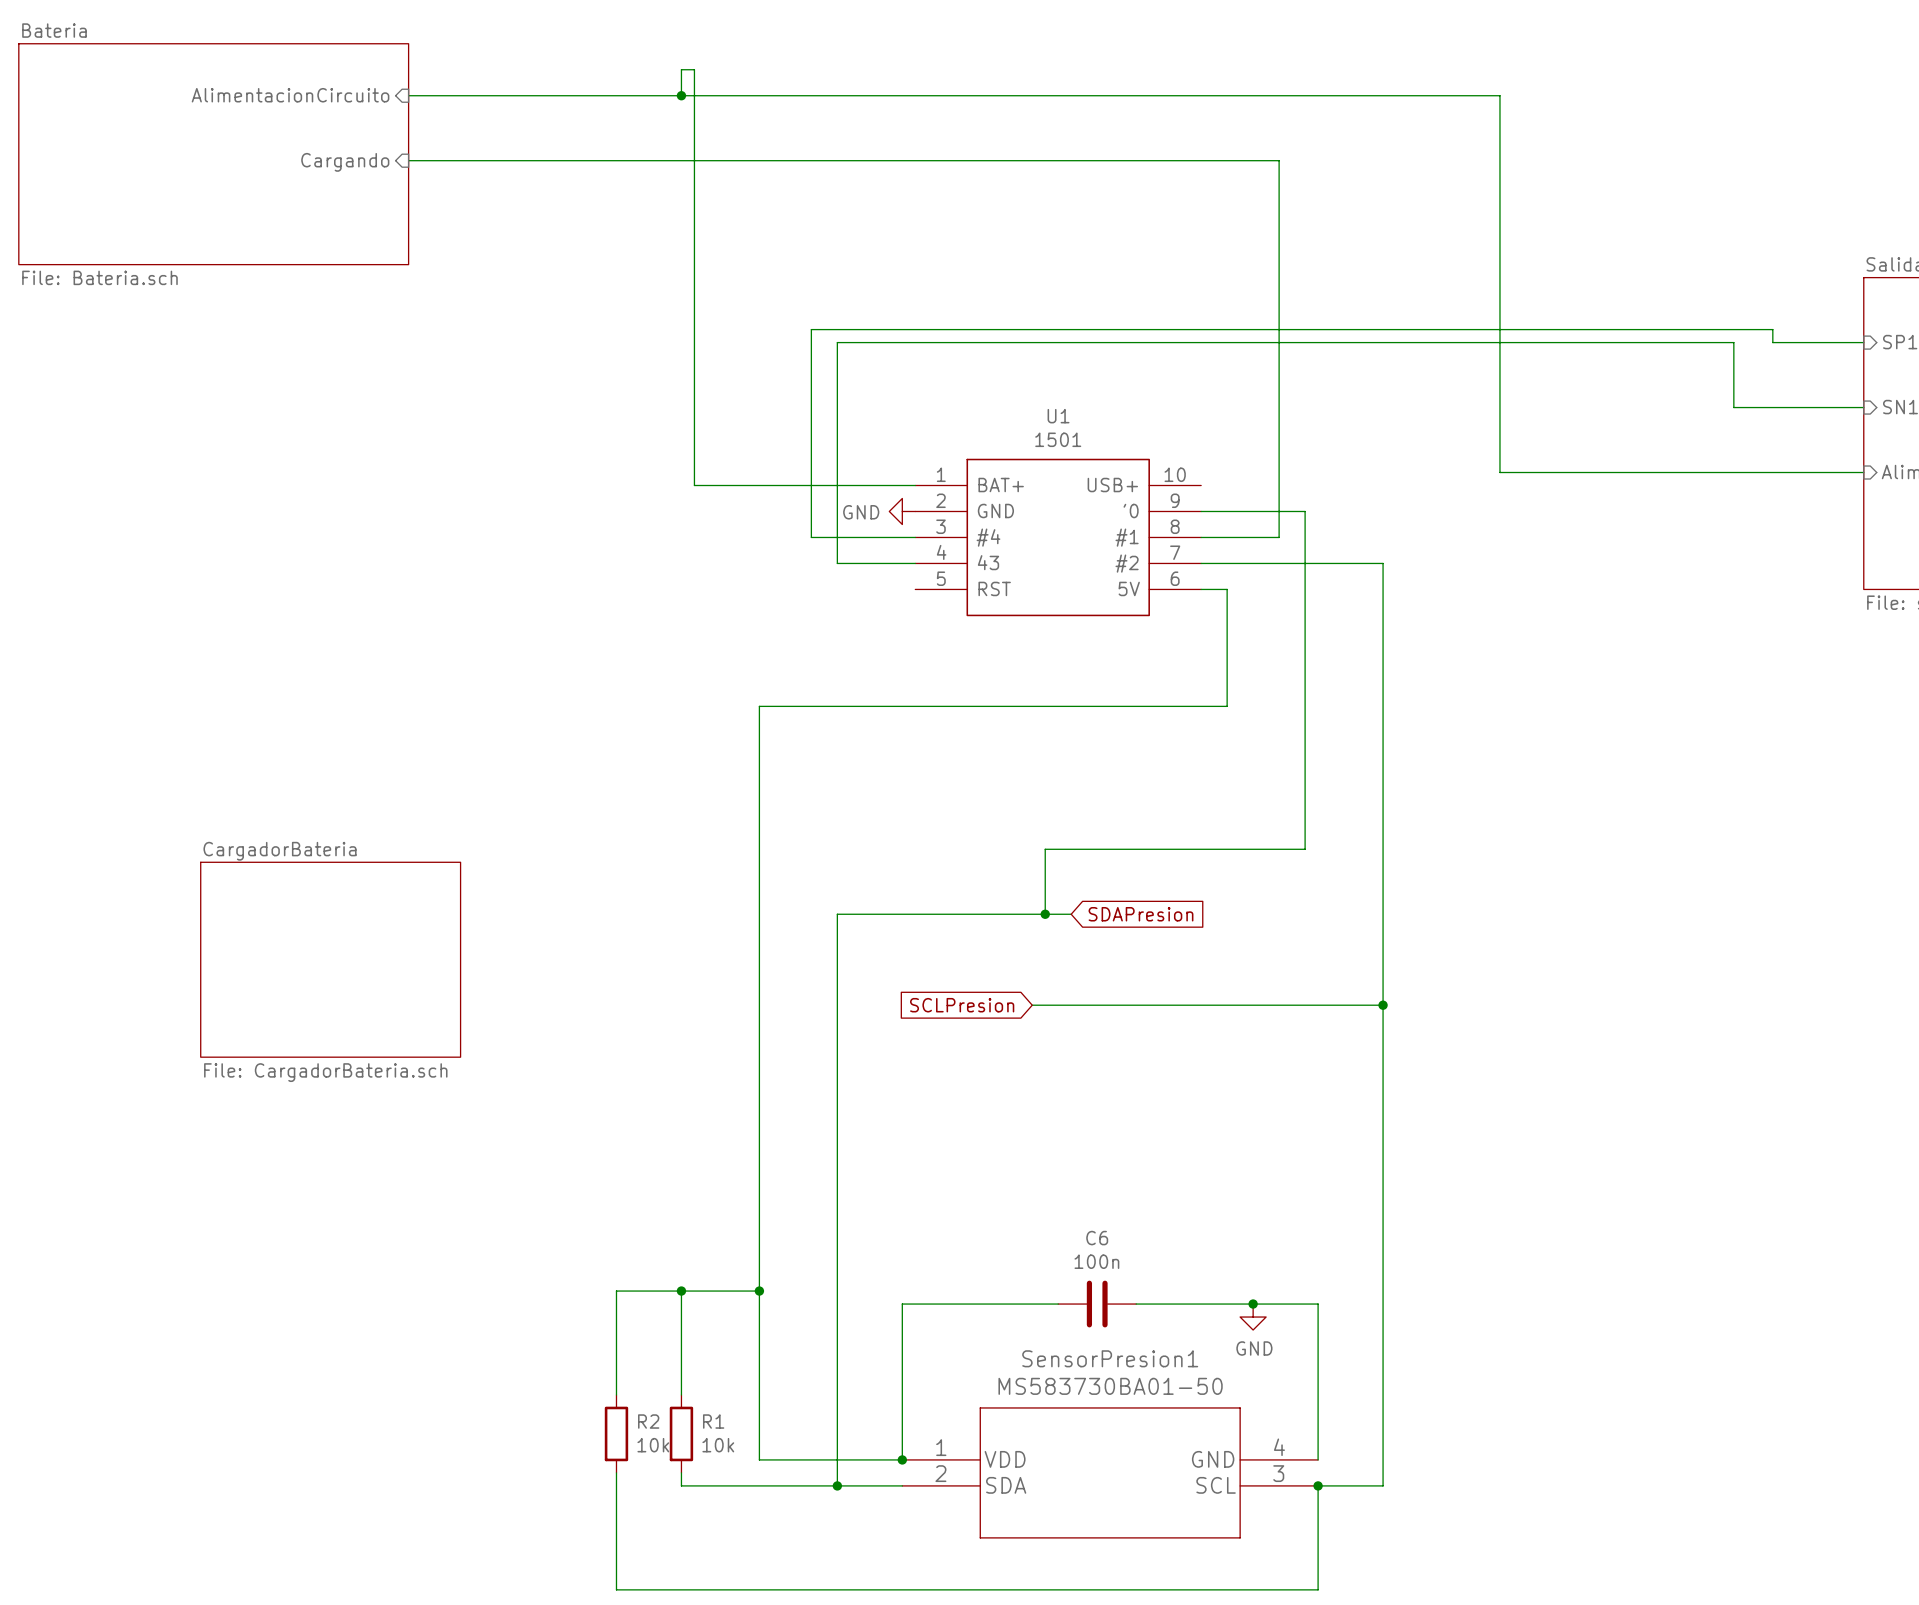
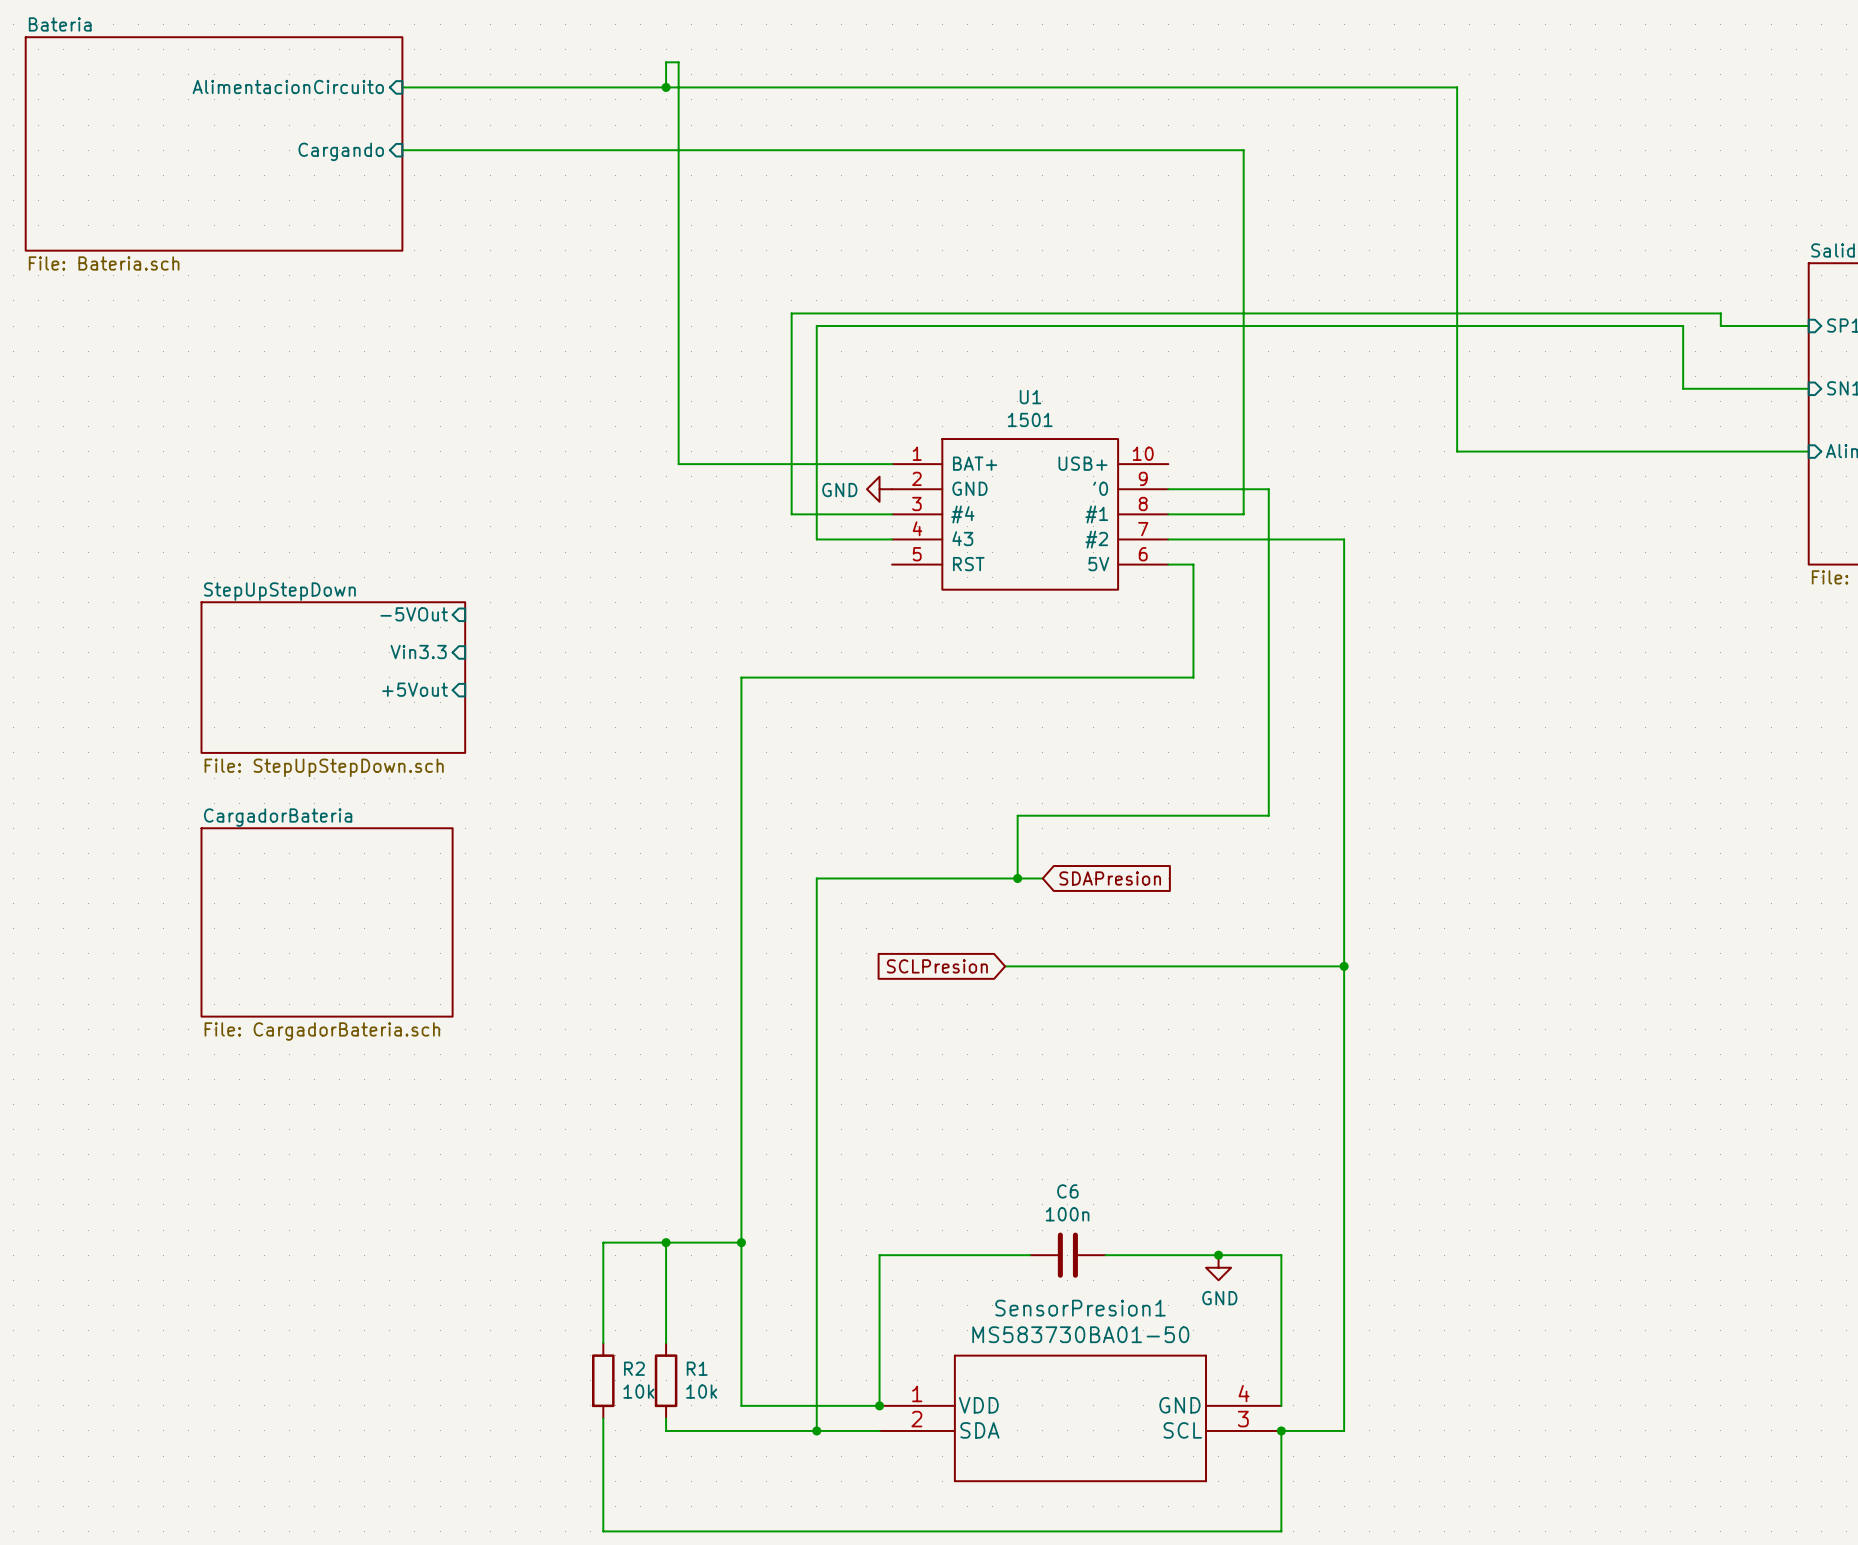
sheet pin: none -> -5VOut (414, 614)
sheet pin: none -> Vin3.3 (418, 652)
sheet StepUpStepDown: none -> File: StepUpStepDown.sch (333, 677)
sheet pin: none -> +5Vout (415, 689)

